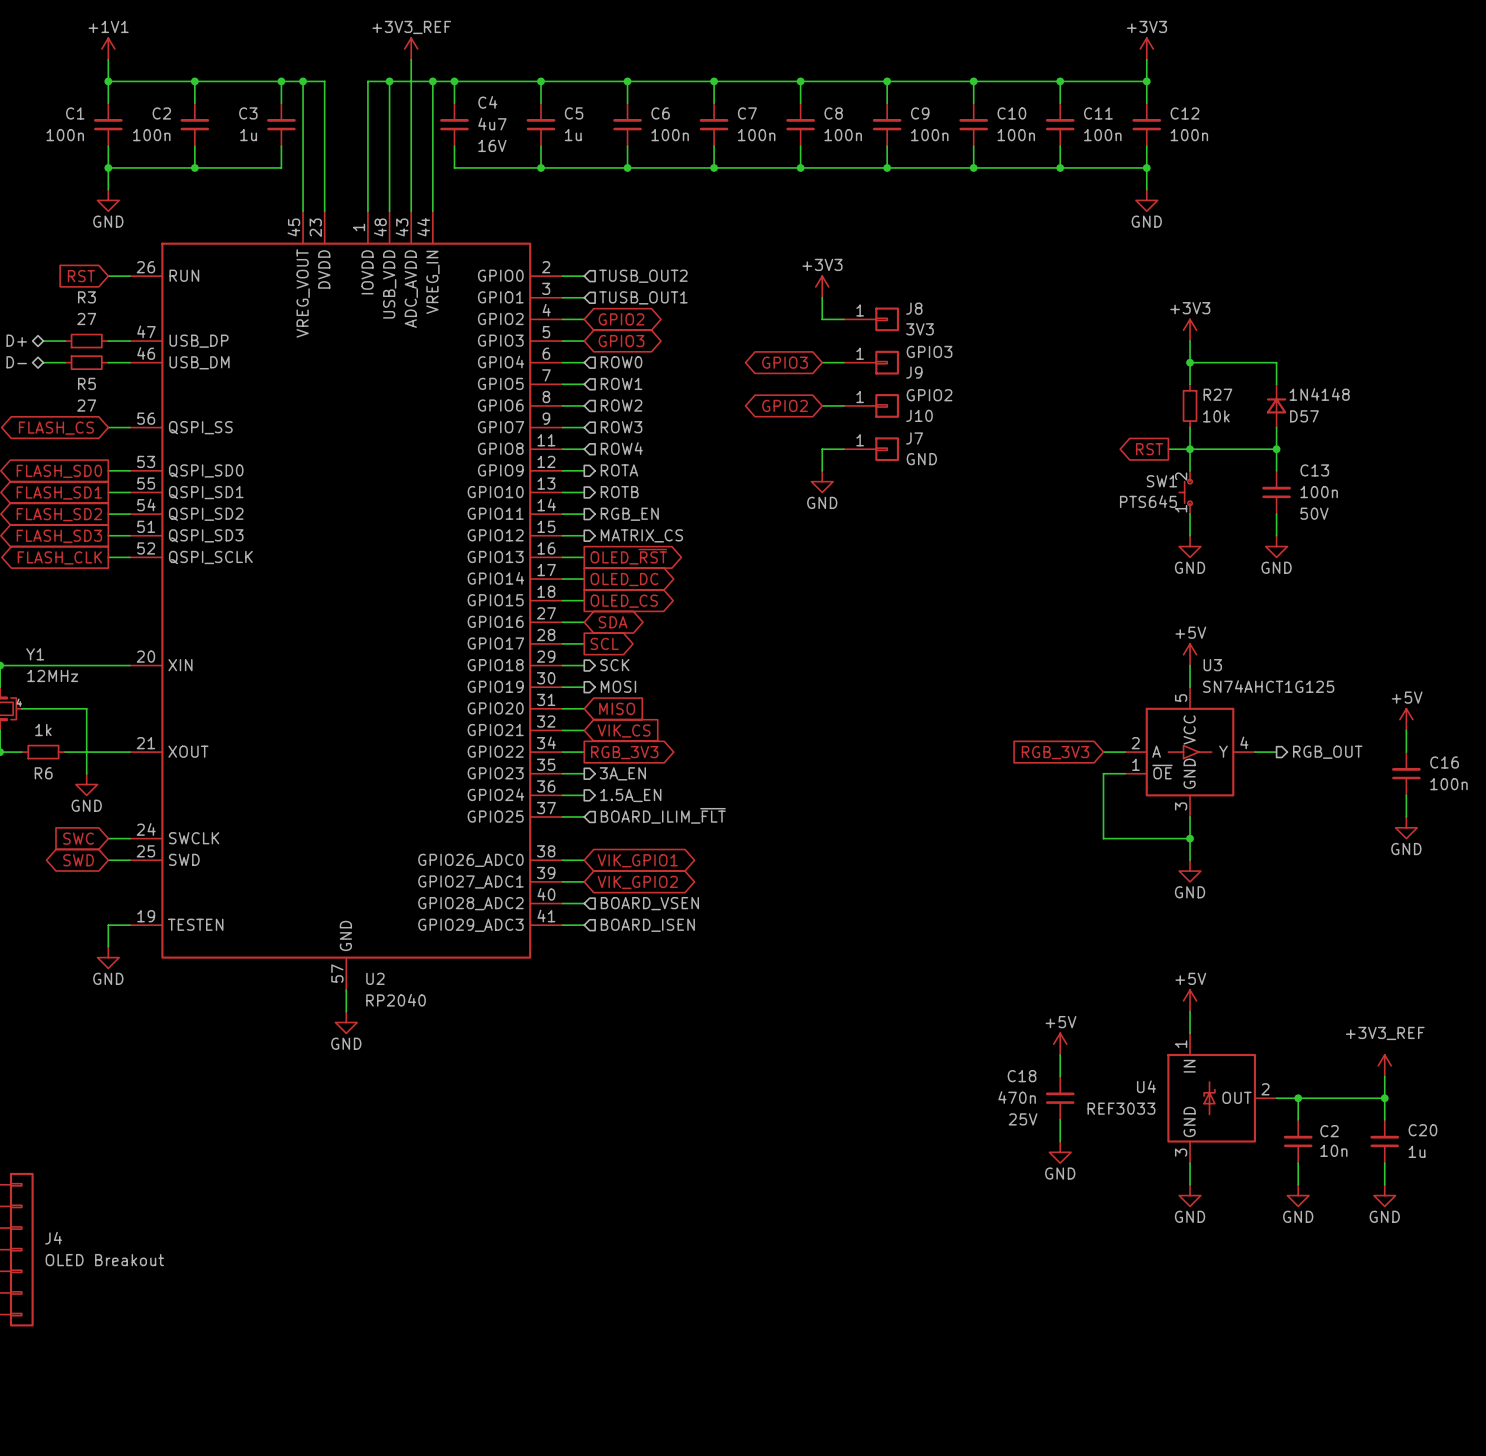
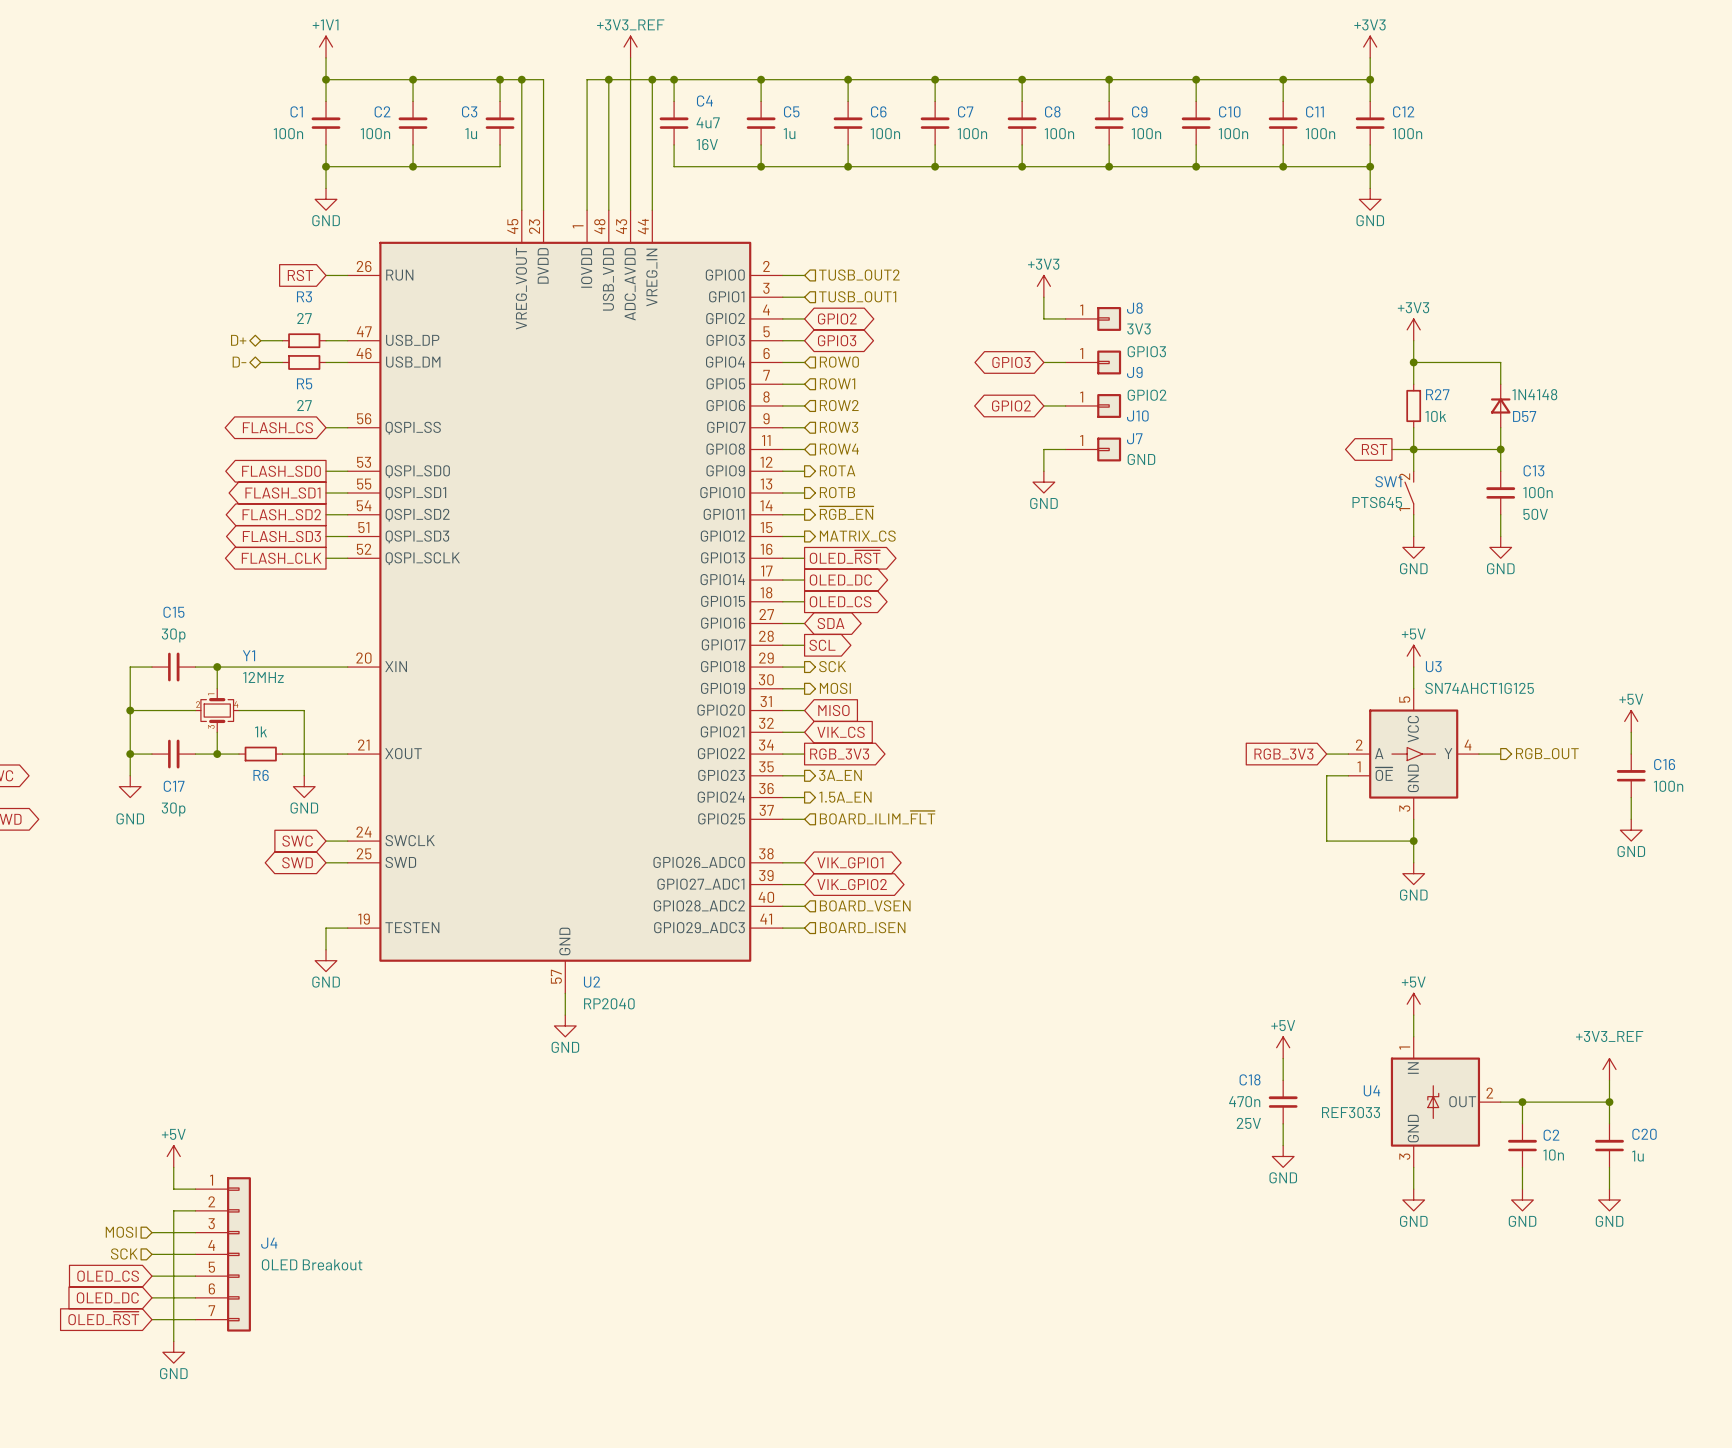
SW1 symbol: [1179, 470, 1193, 515] -> [1405, 471, 1414, 515]
hierarchical label: RGB_EN (629, 514) -> ~{RGB_EN} (846, 513)

